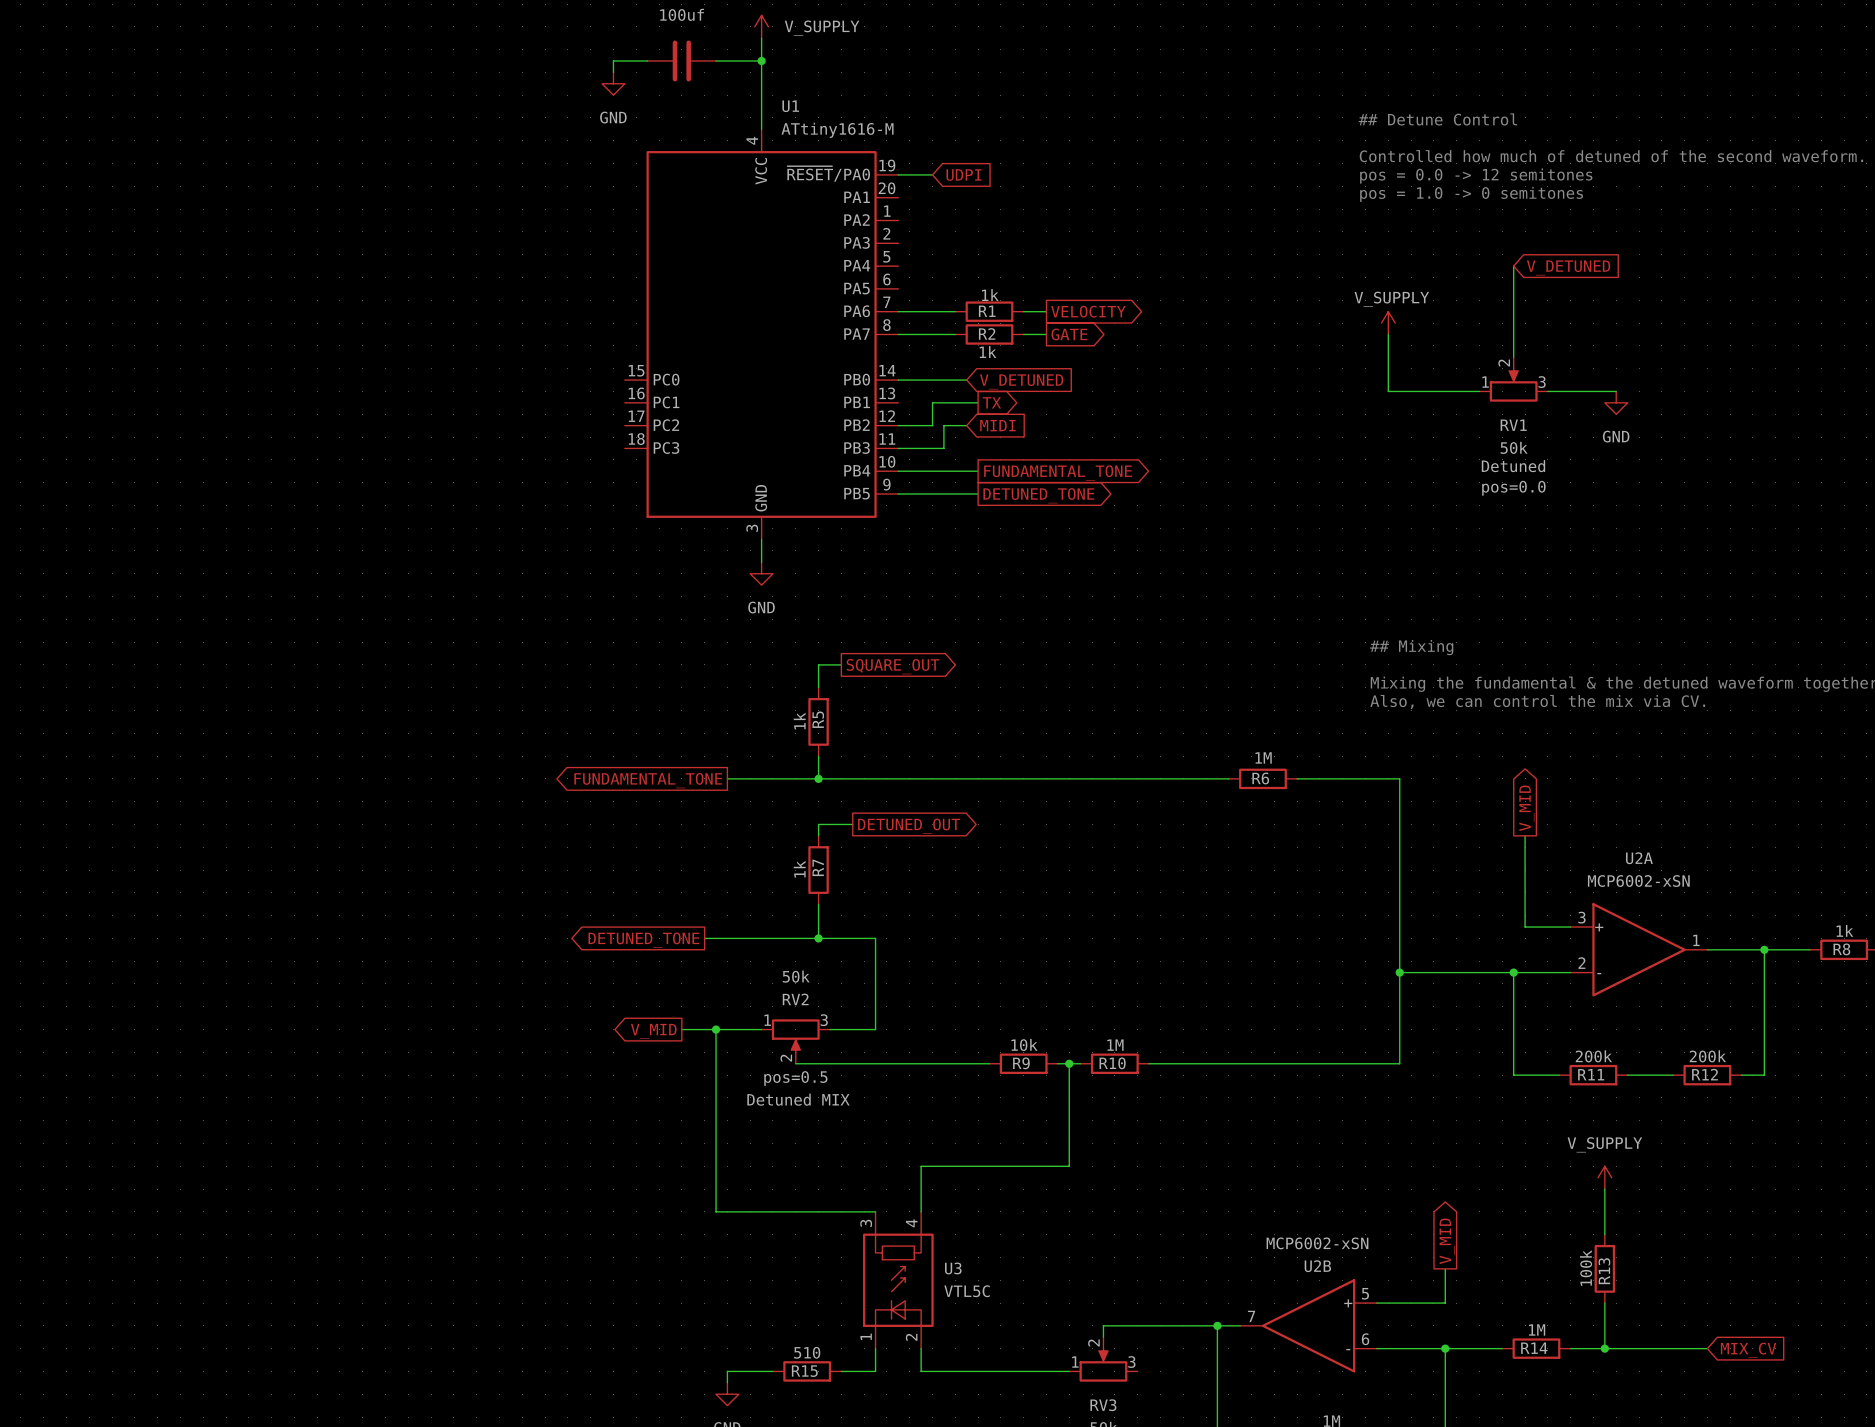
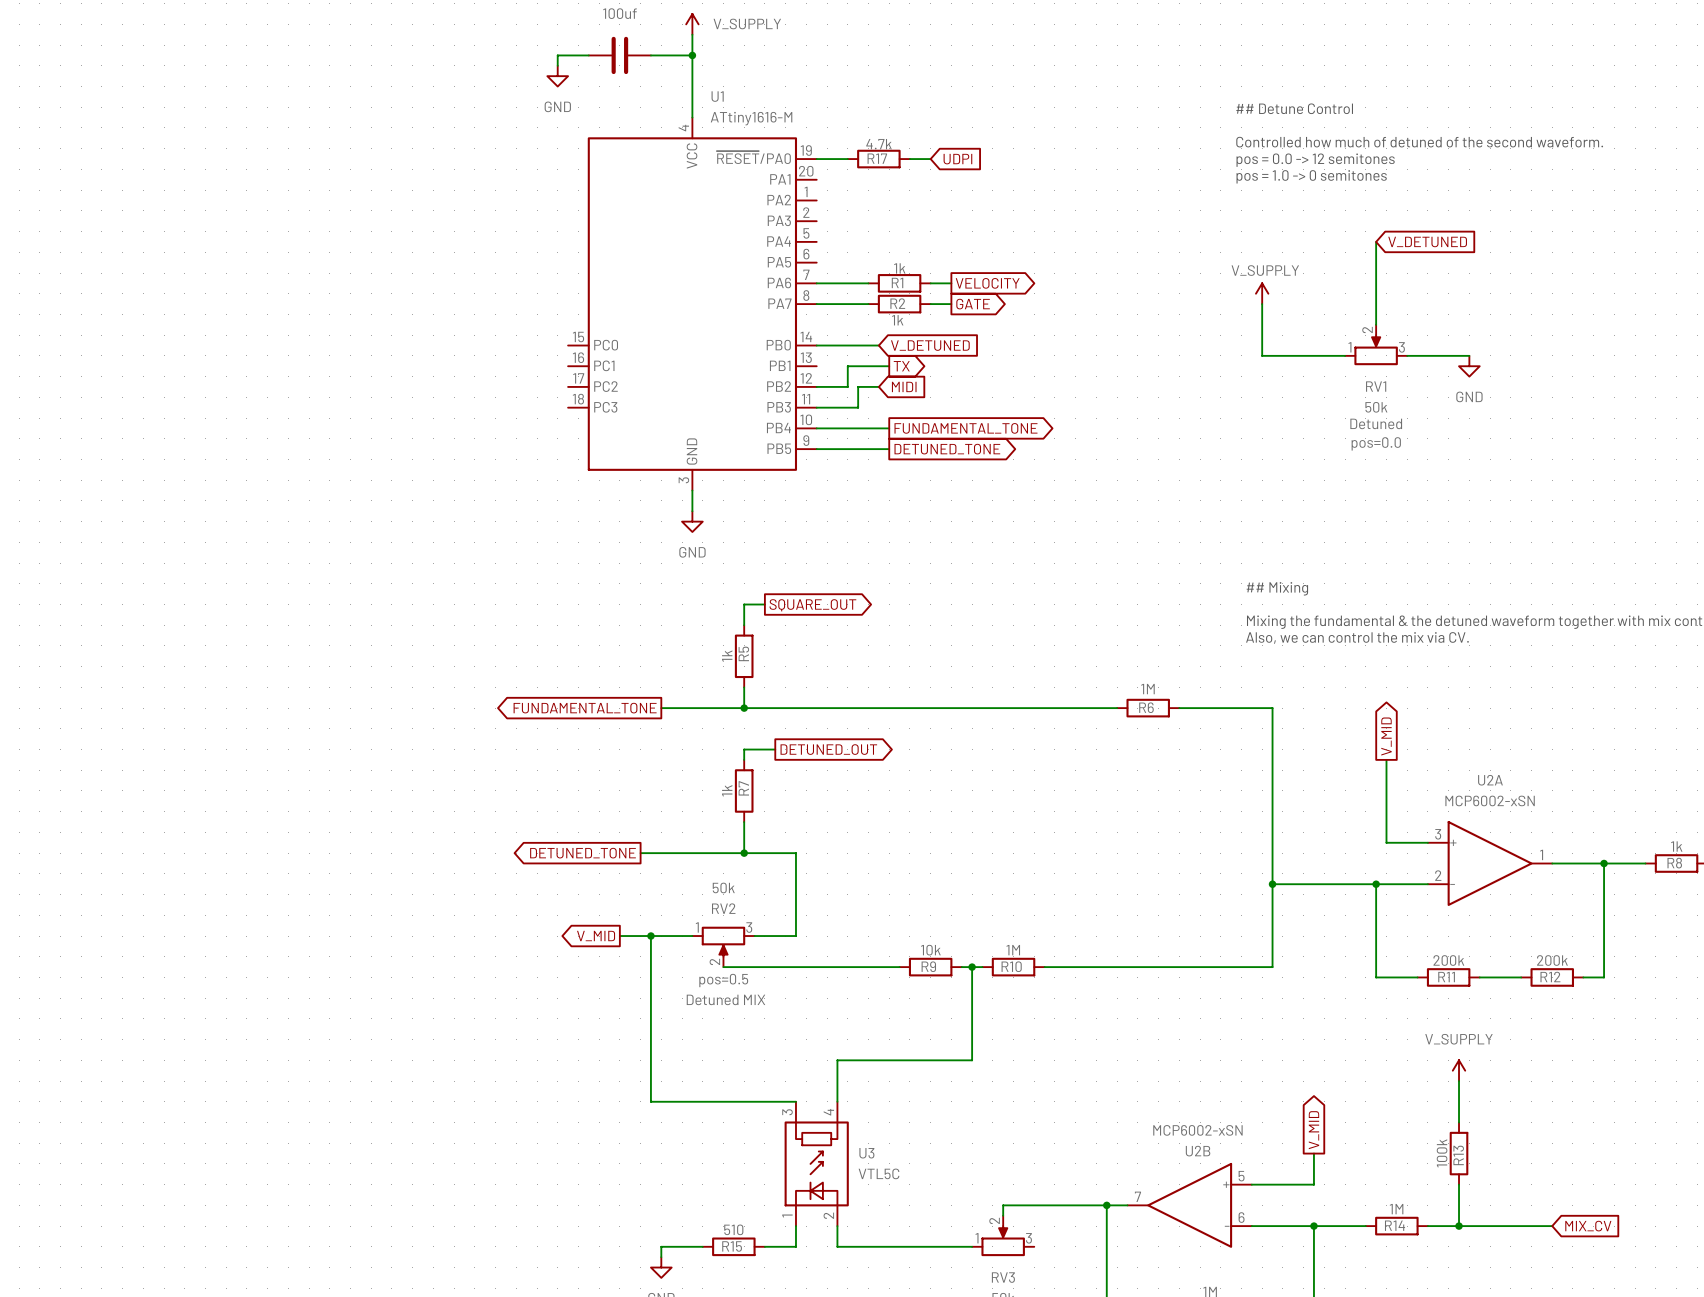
R17: none -> 4.7k (878, 159)
wire: none -> (909, 159) (930, 159)
global label position: UDPI (963, 175) -> UDPI (957, 159)

